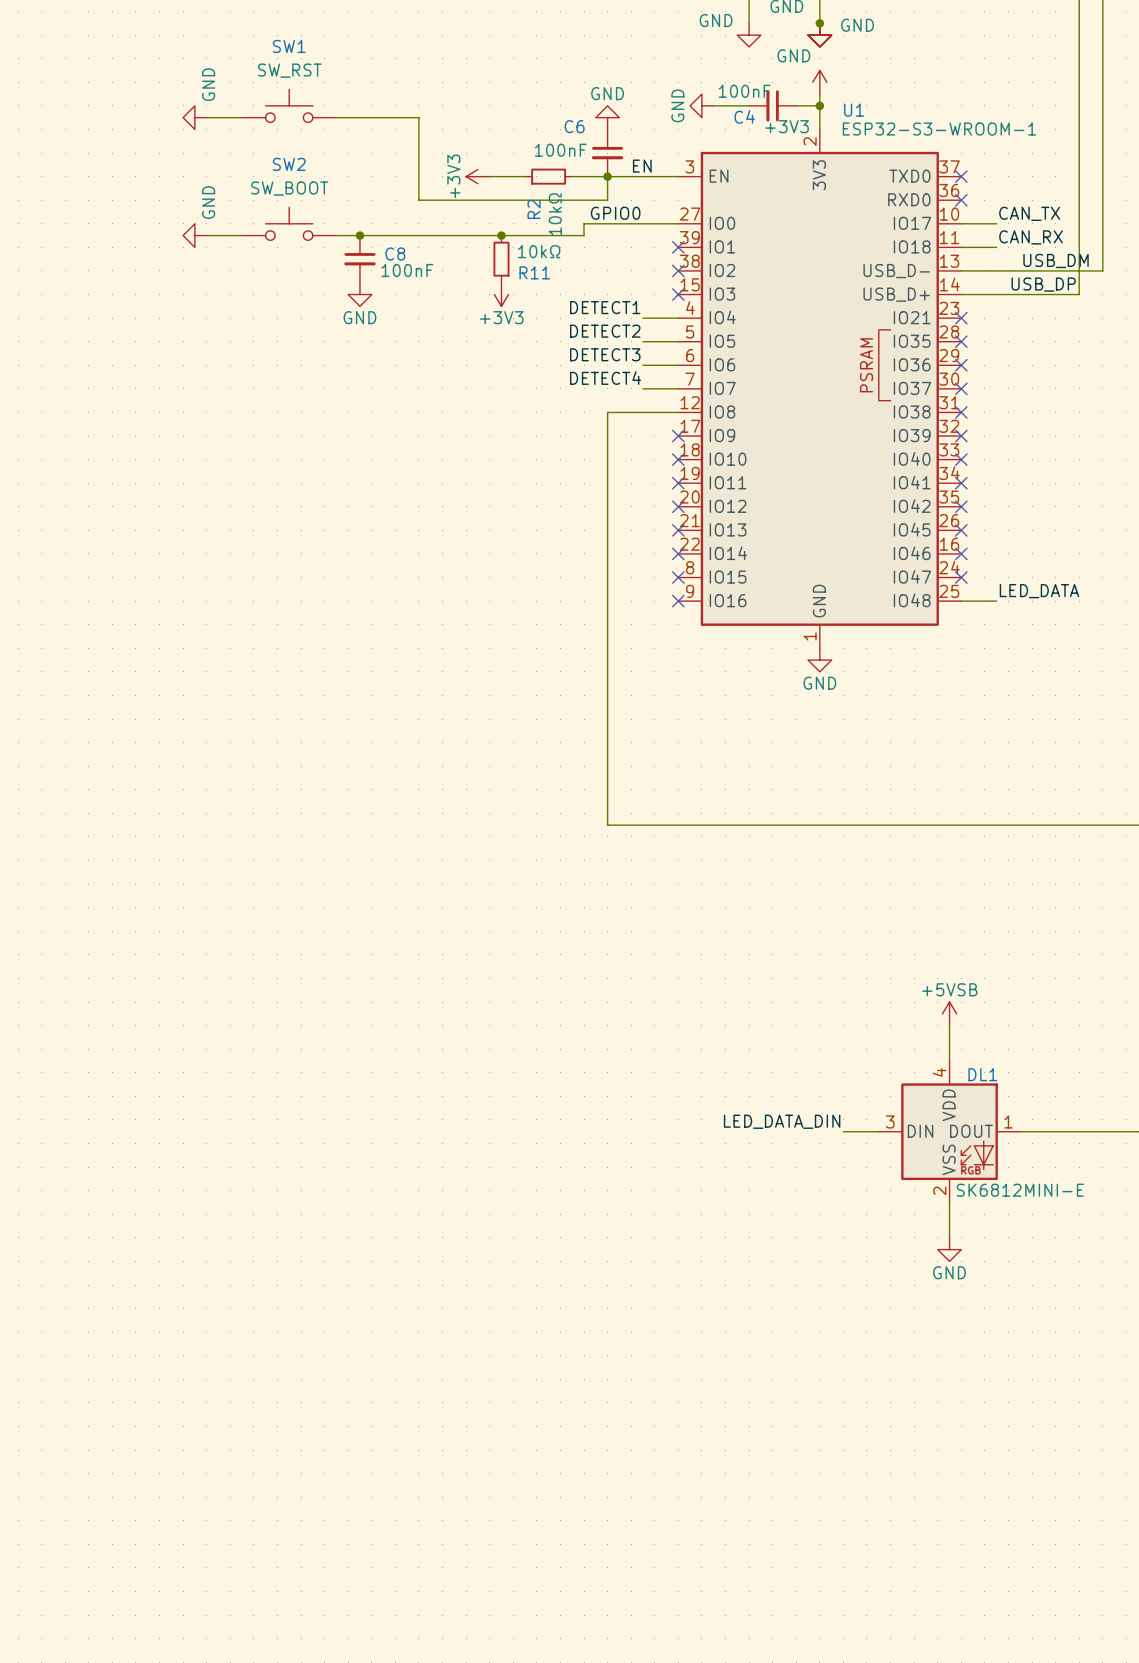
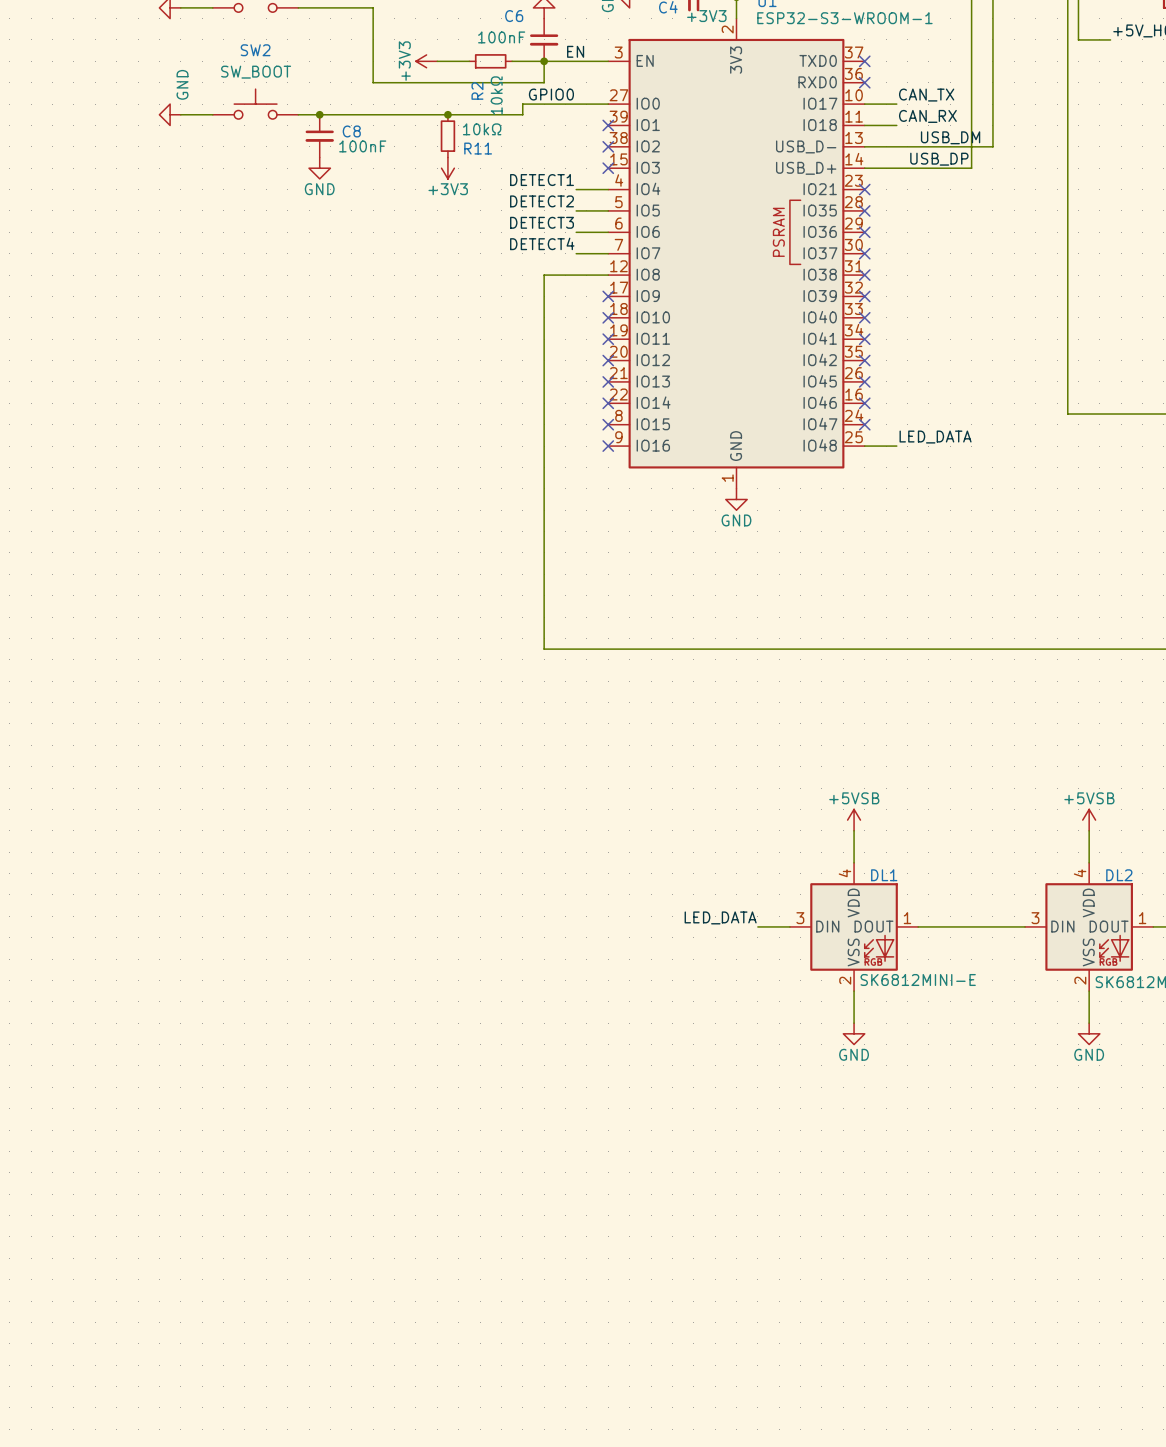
label: LED_DATA_DIN (782, 1121) -> LED_DATA (720, 917)

